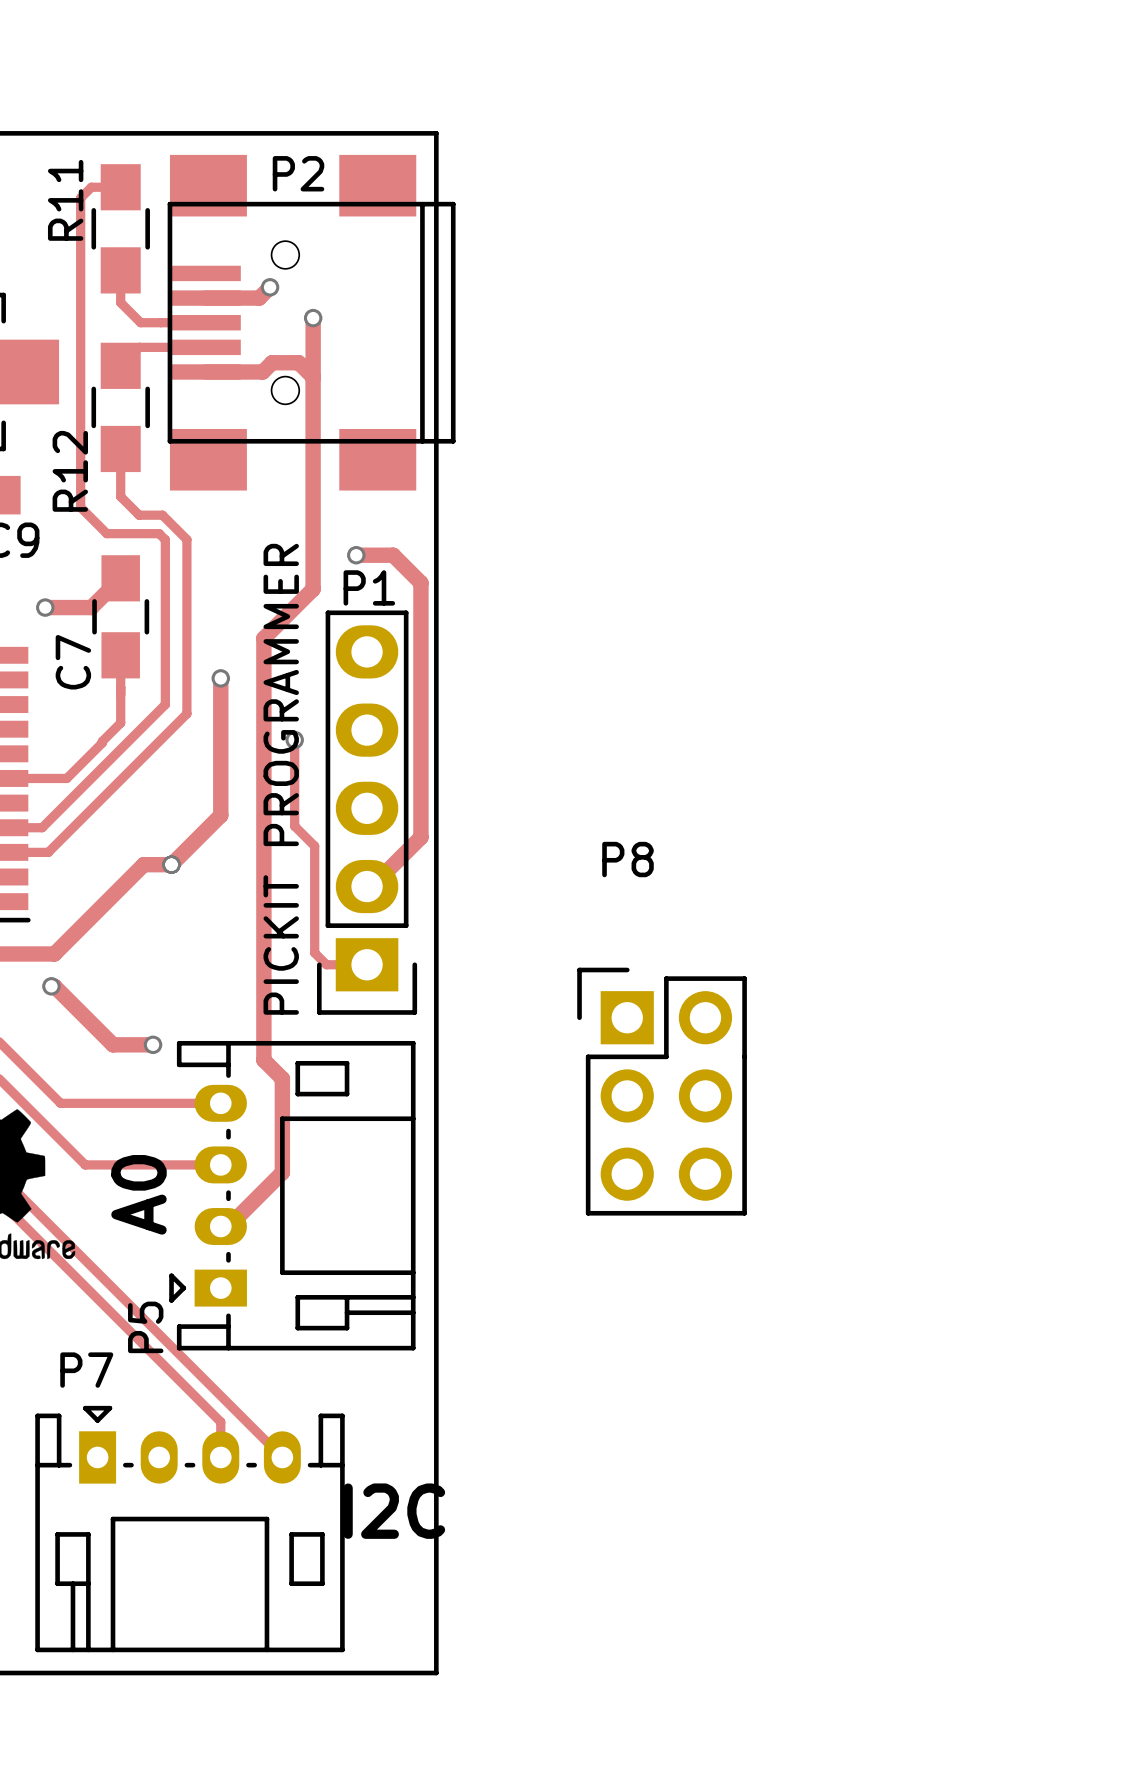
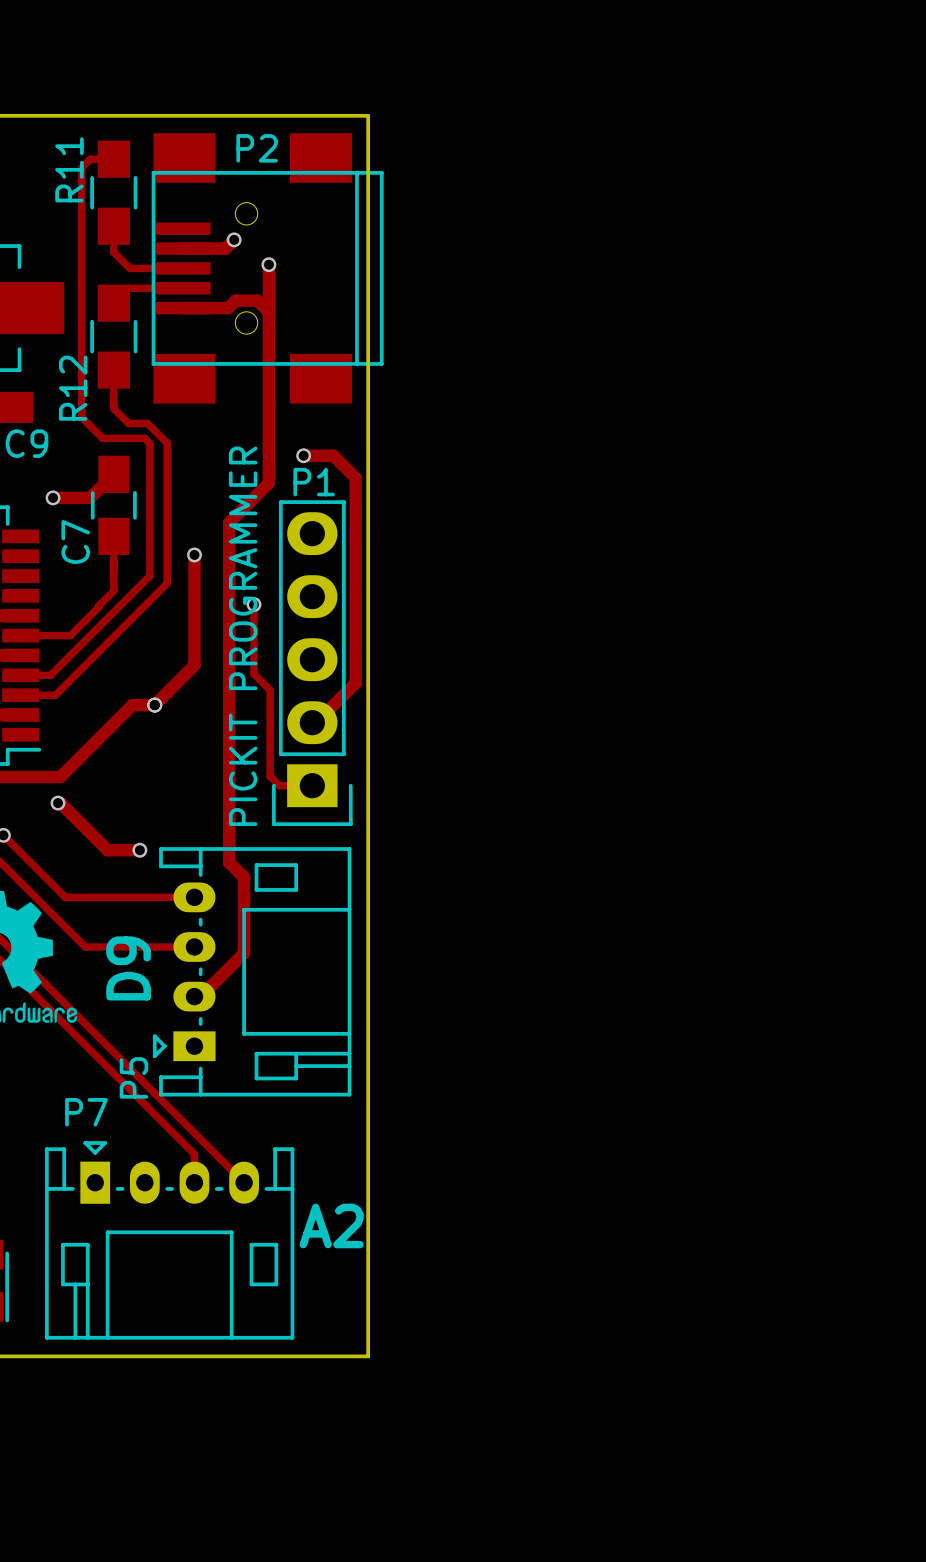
P8: (662, 1091) -> none
P5 value: A0 (138, 1194) -> D9 (128, 968)
P7 value: I2C (394, 1511) -> A2 (331, 1225)

